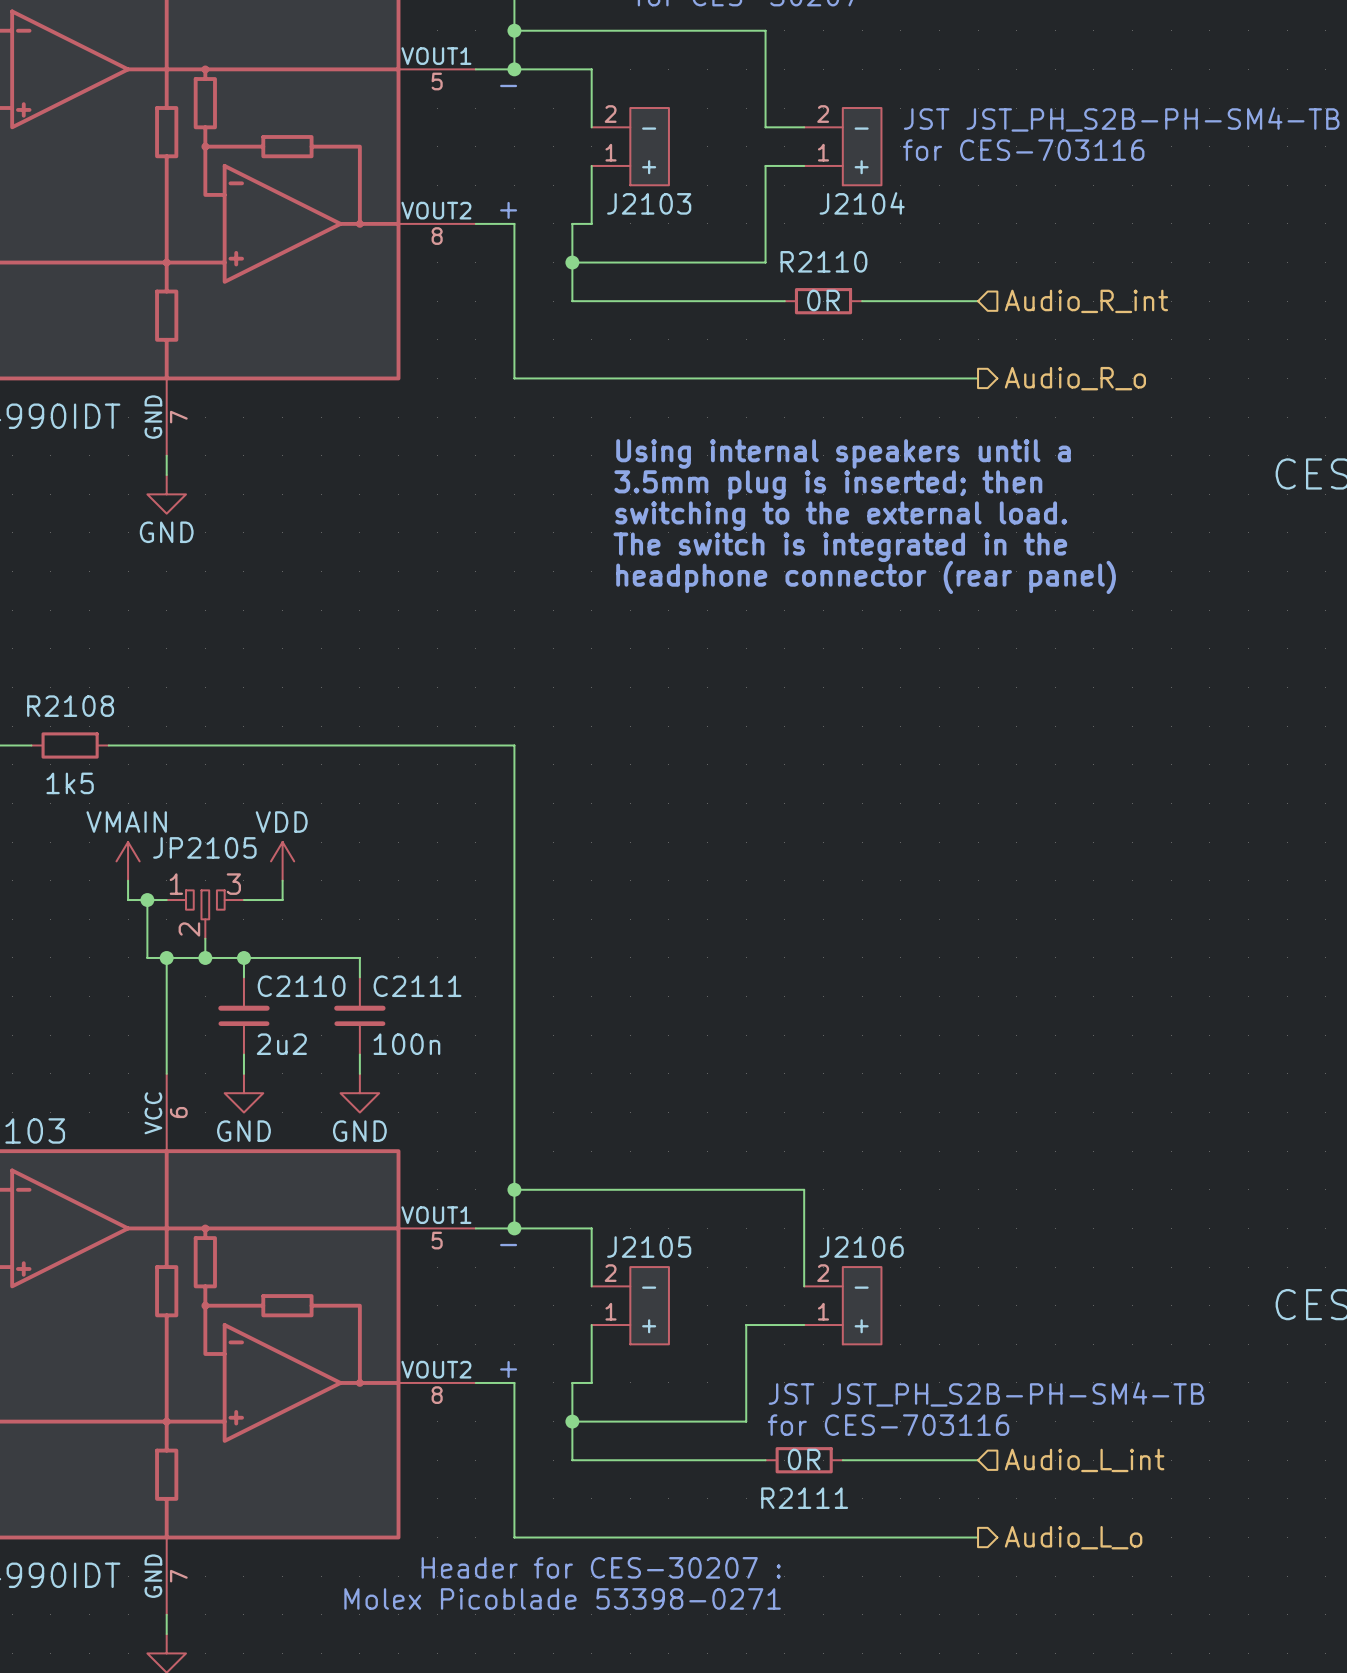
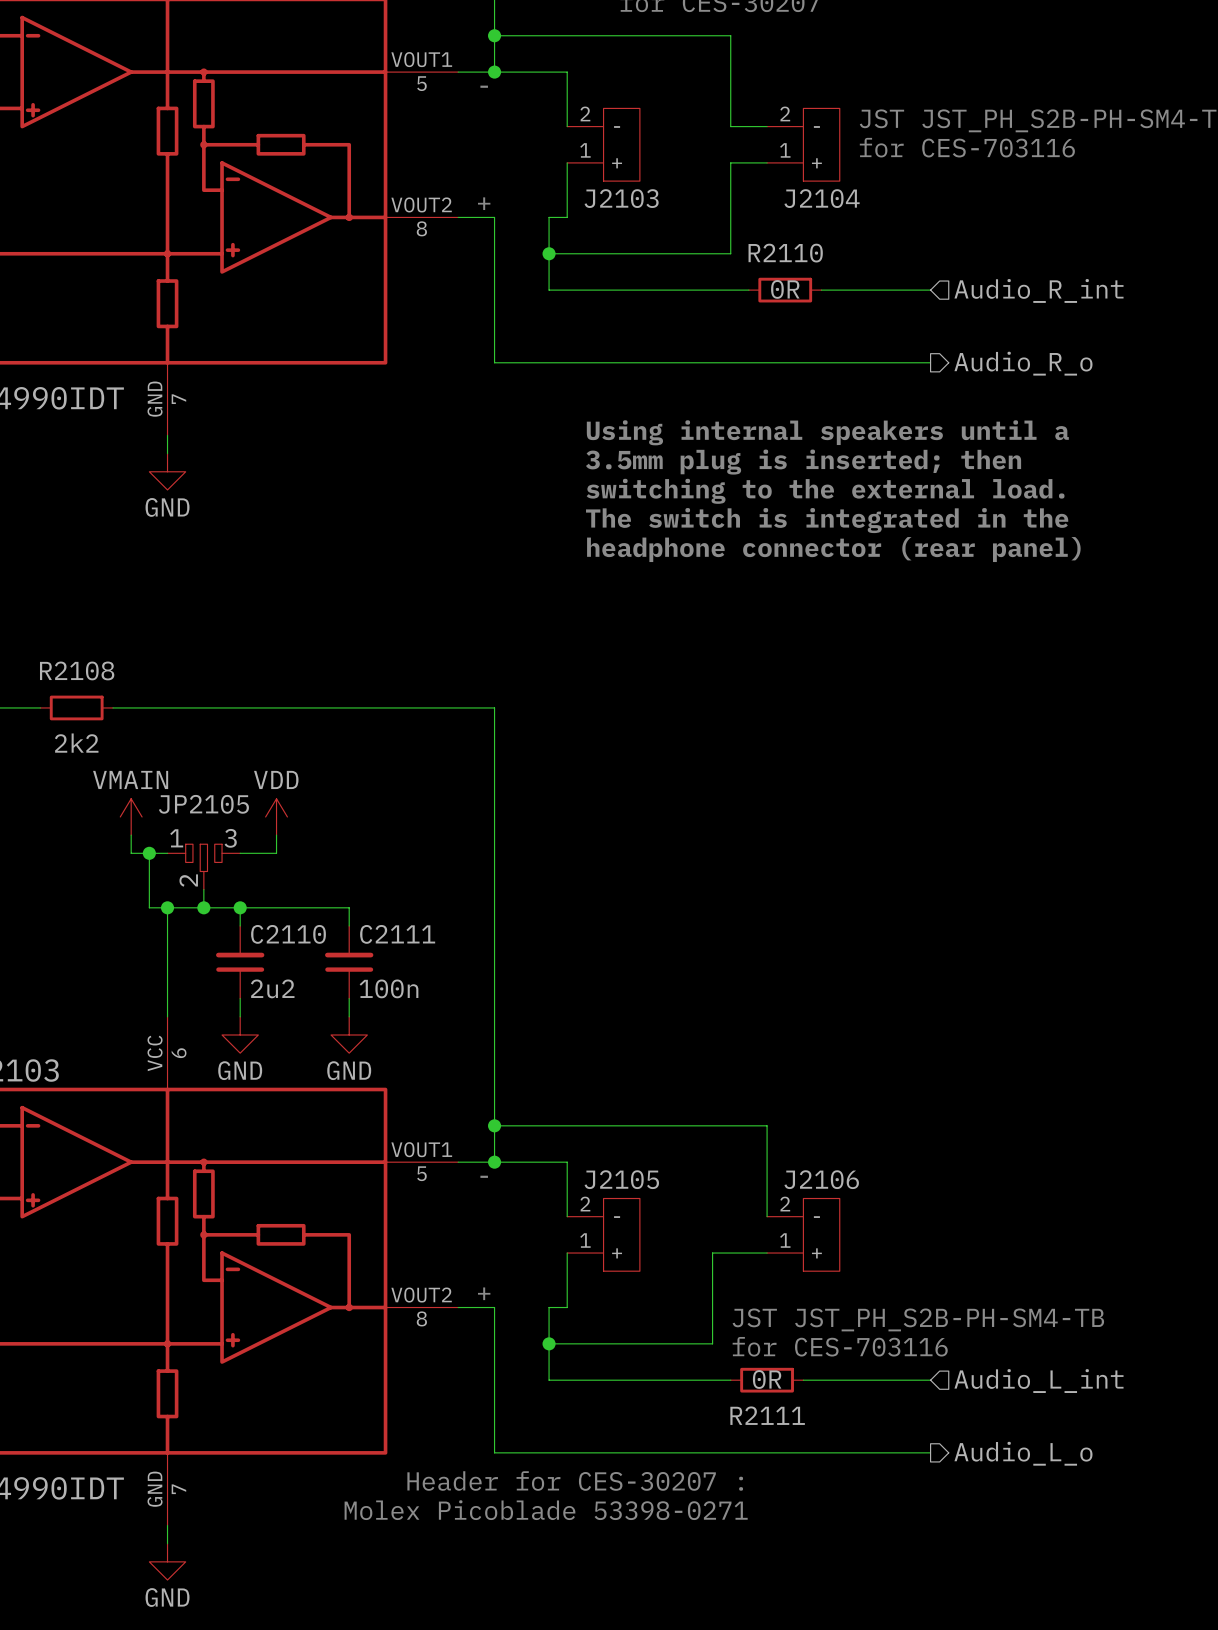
R2108 value: 1k5 (70, 783) -> 2k2 (76, 743)

